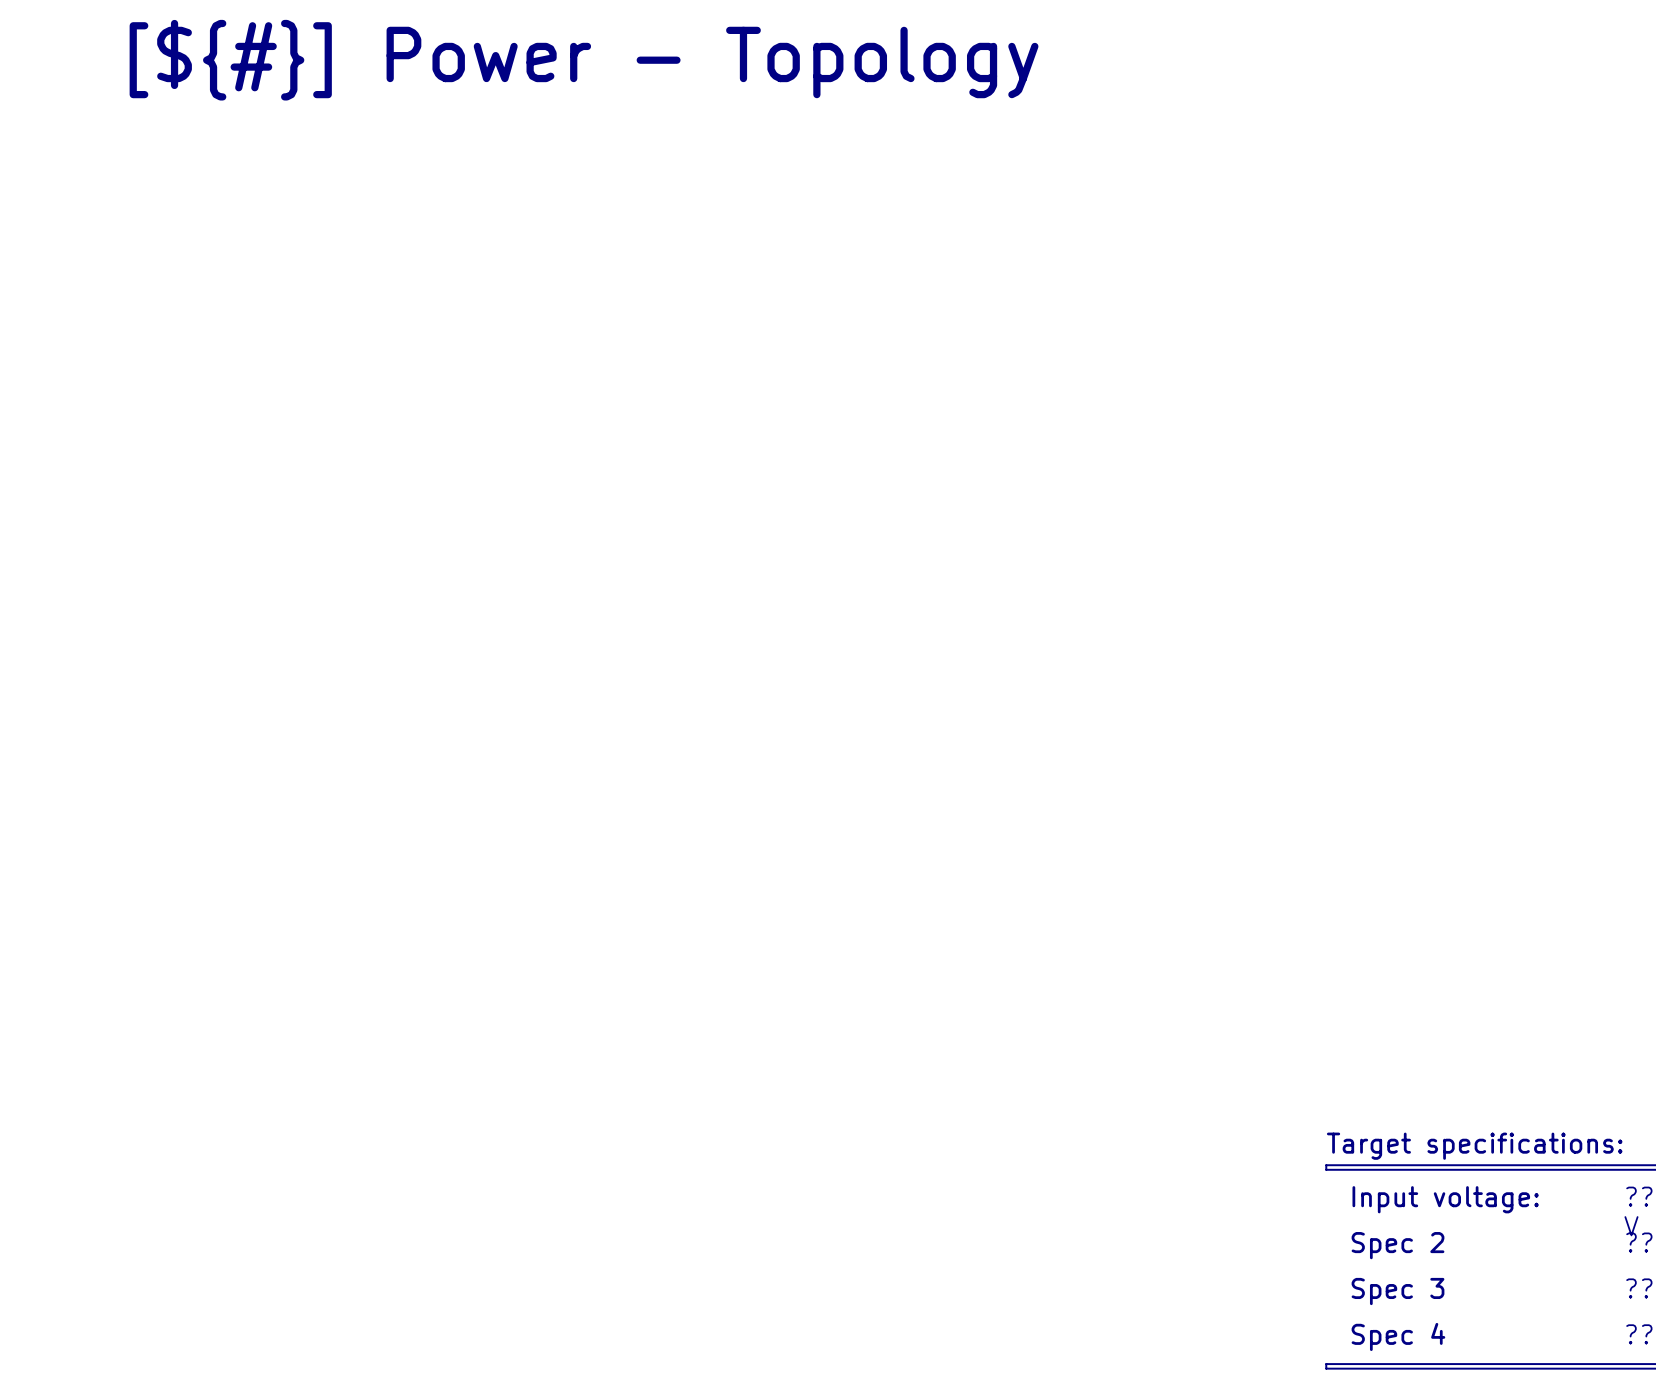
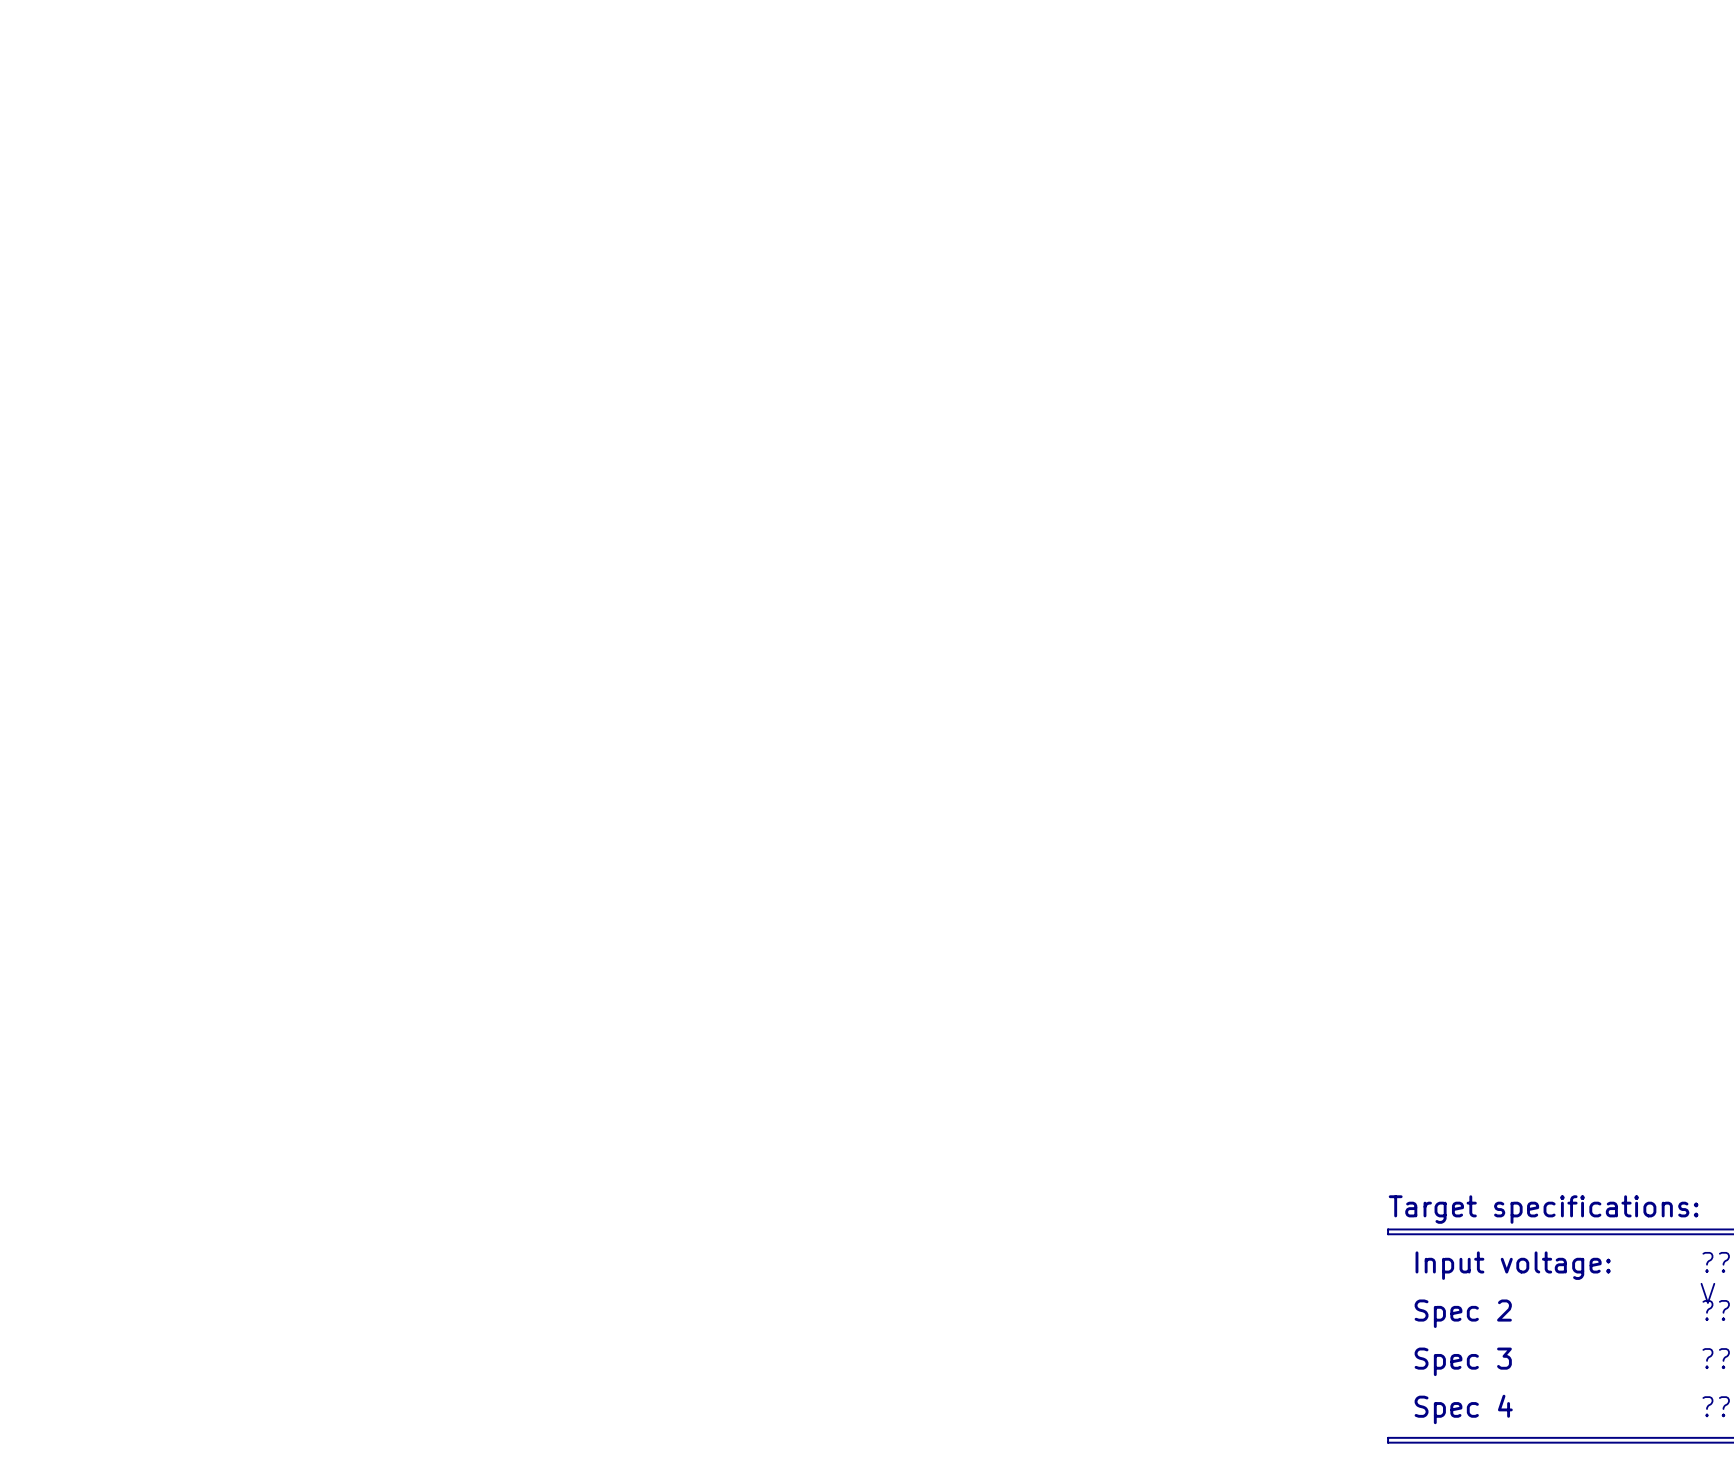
text: [${#}] Power - Topology (584, 60) -> none

